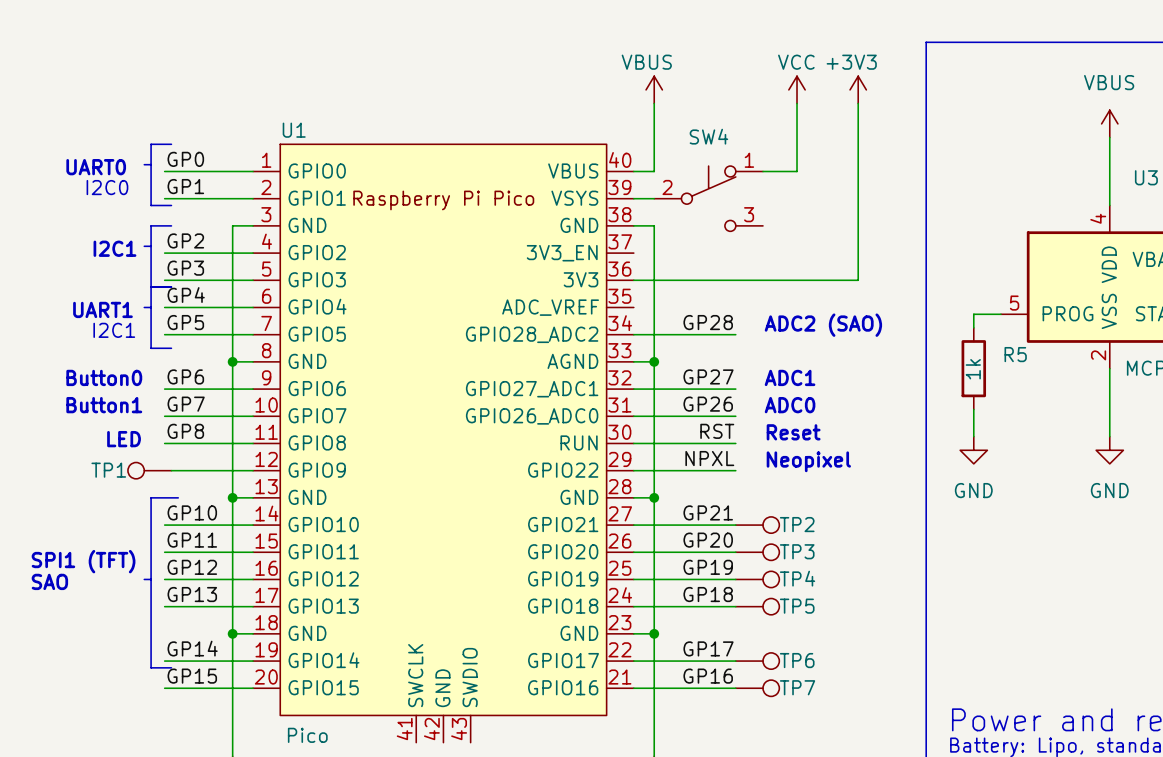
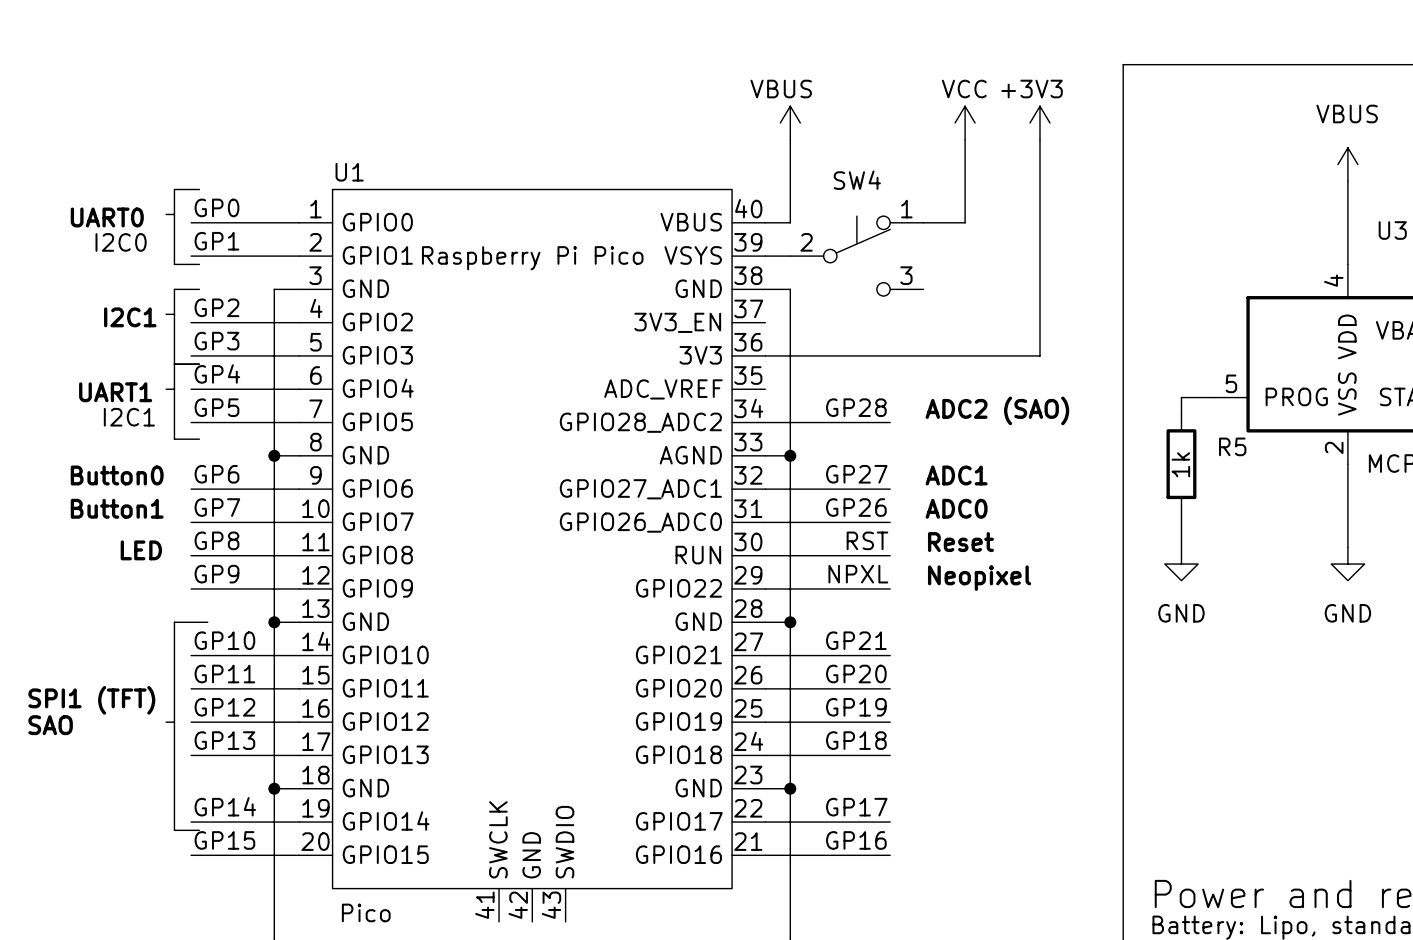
label: none -> GP9 (216, 574)
TP1: (149, 470) -> none
TP2: (757, 525) -> none
TP3: (757, 552) -> none
TP4: (757, 579) -> none
TP5: (757, 606) -> none
TP6: (757, 661) -> none
TP7: (757, 688) -> none

